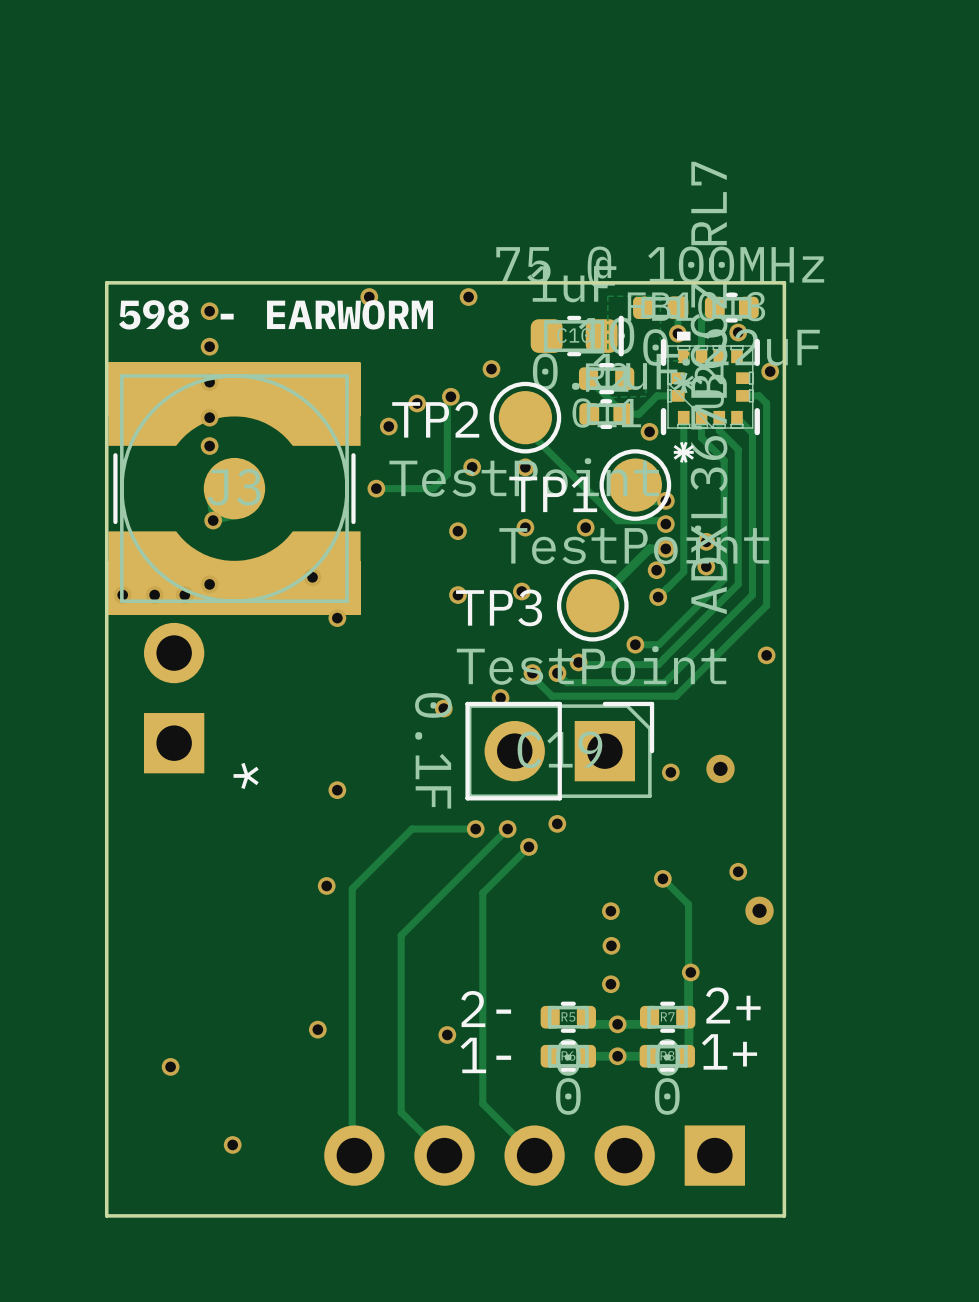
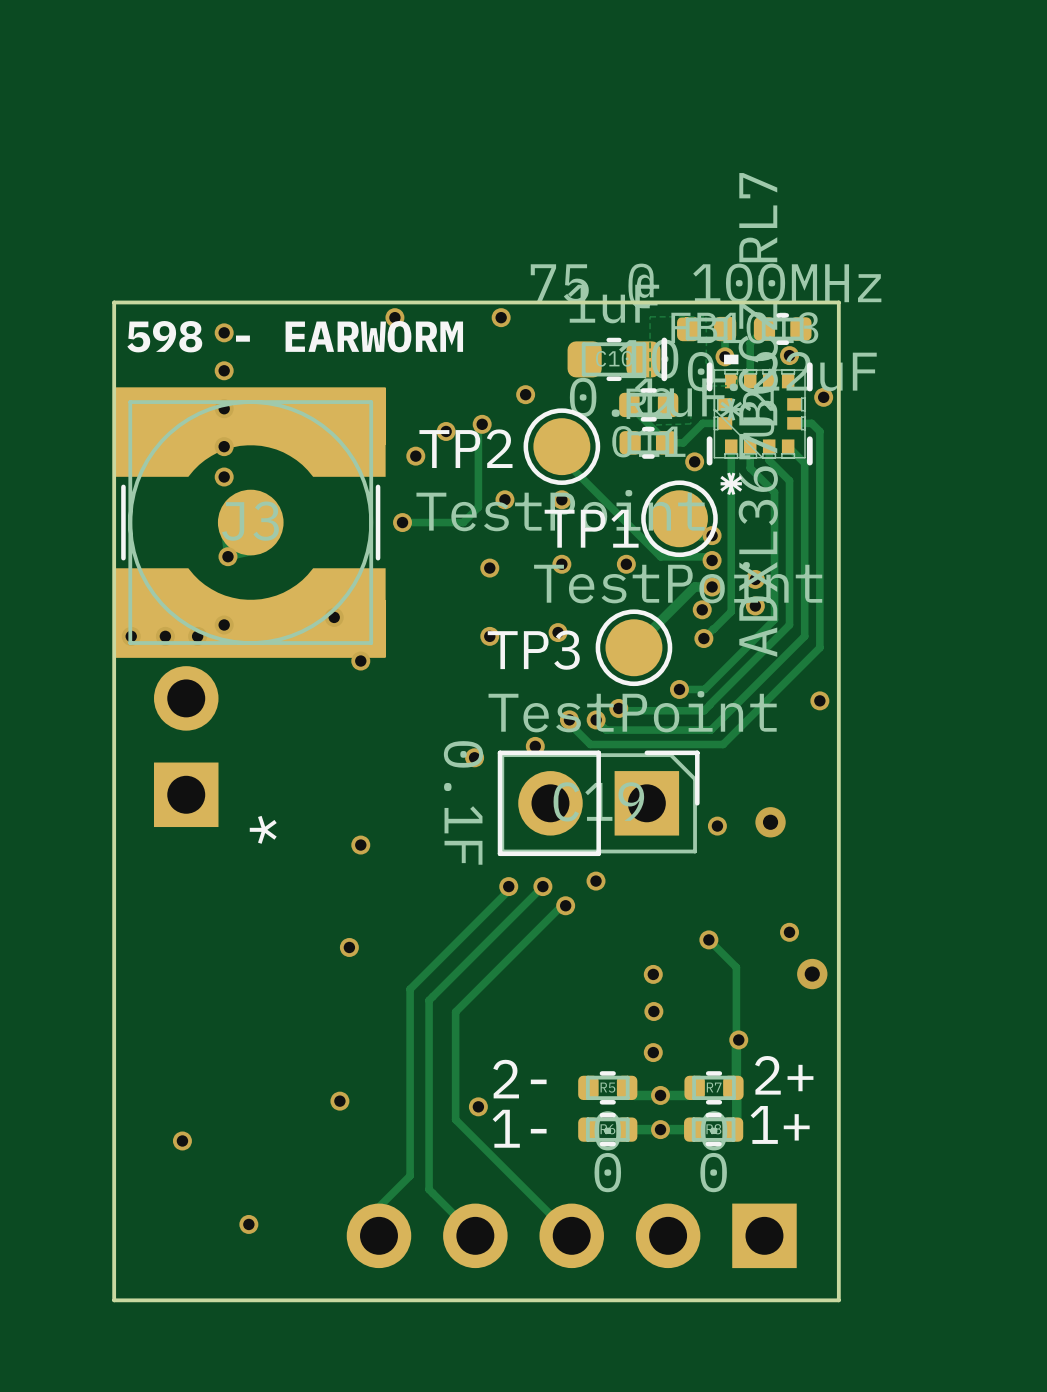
track: (475, 829) (412, 829) (352, 888) (352, 1130) -> (508, 886) (508, 890) (410, 989) (410, 1175) (376, 1209)
track: (528, 846) (482, 893) (482, 1103) -> (565, 905) (561, 905) (455, 1011) (455, 1119) (516, 1180)

